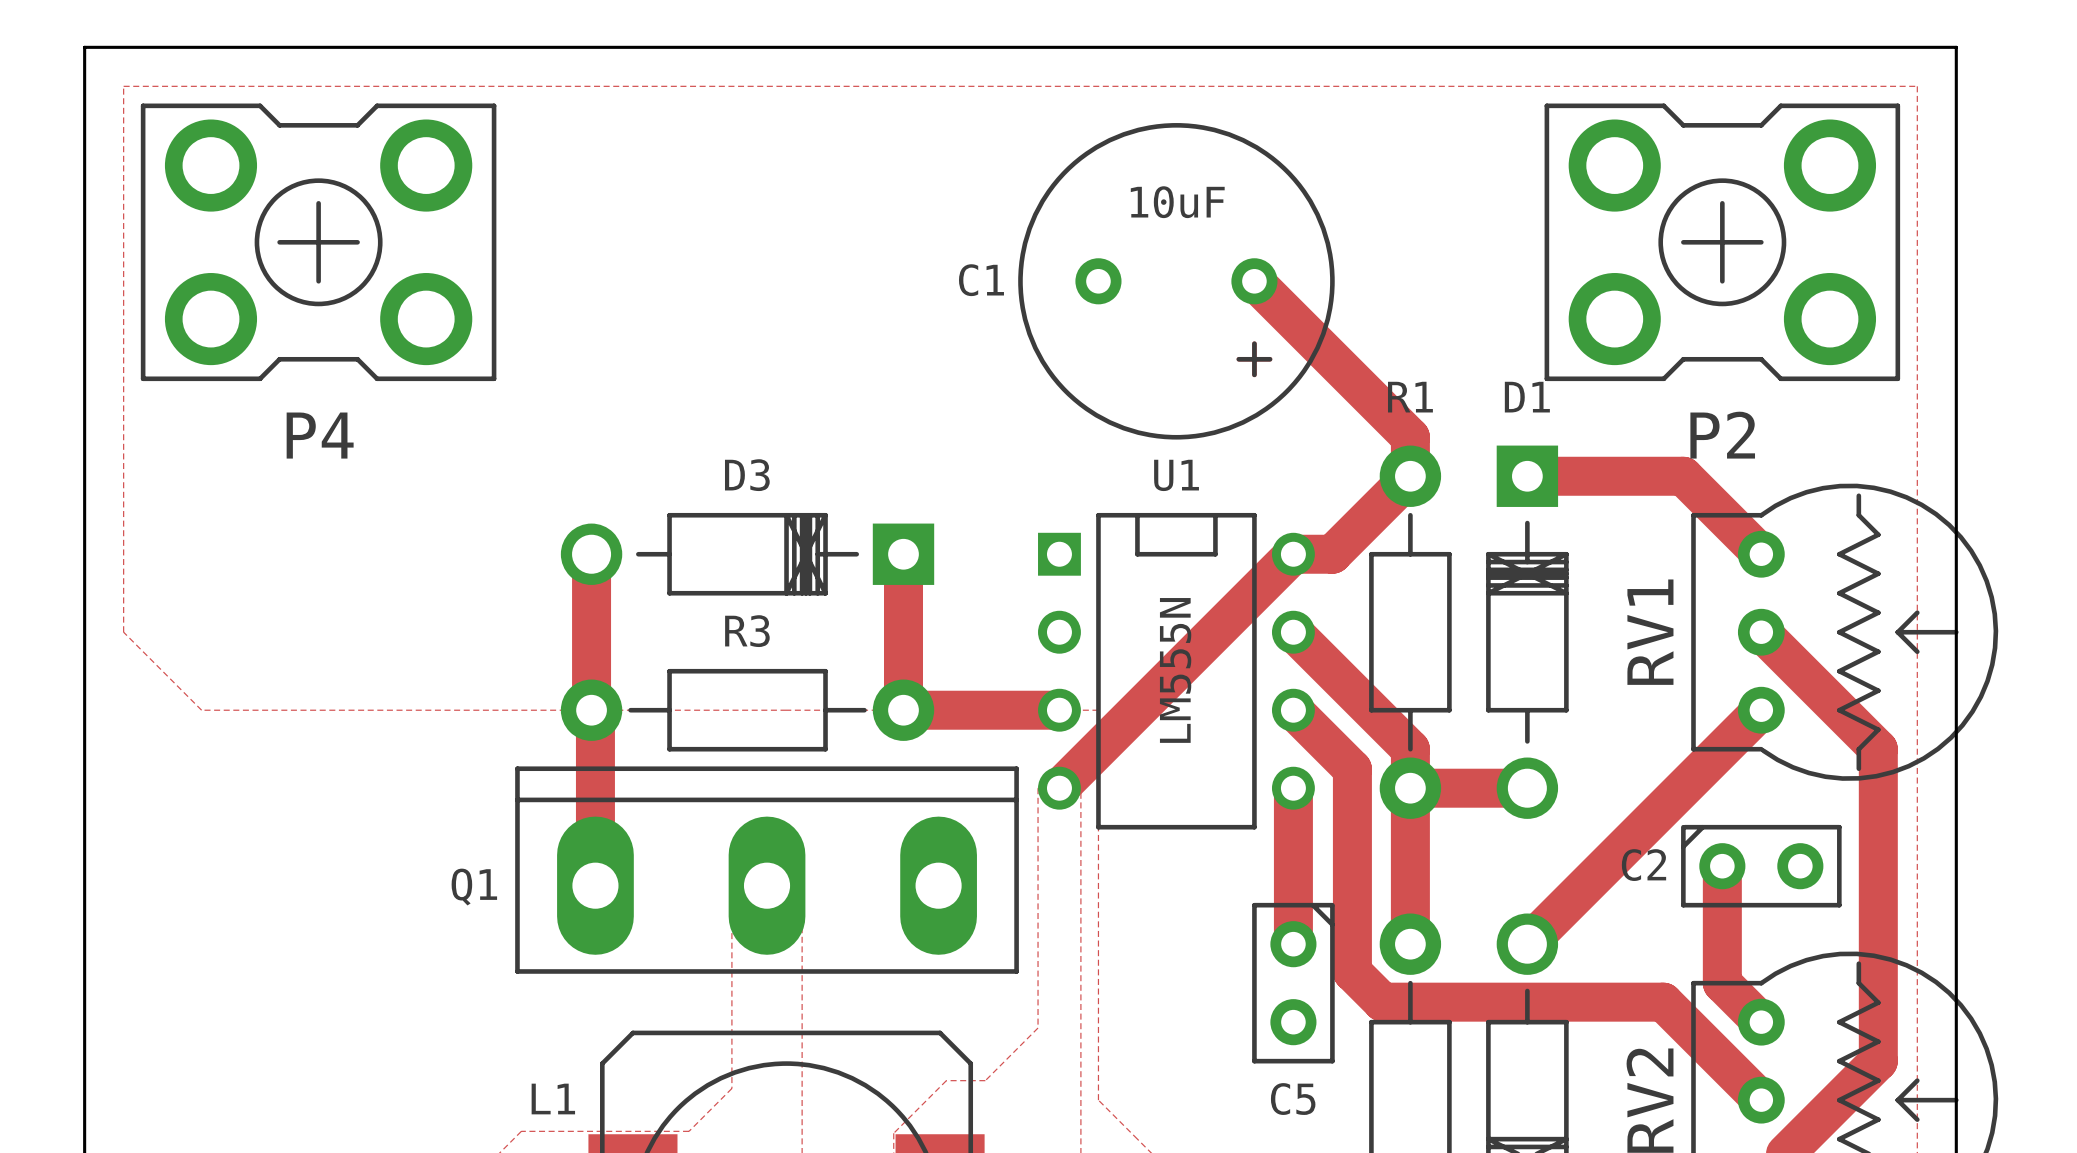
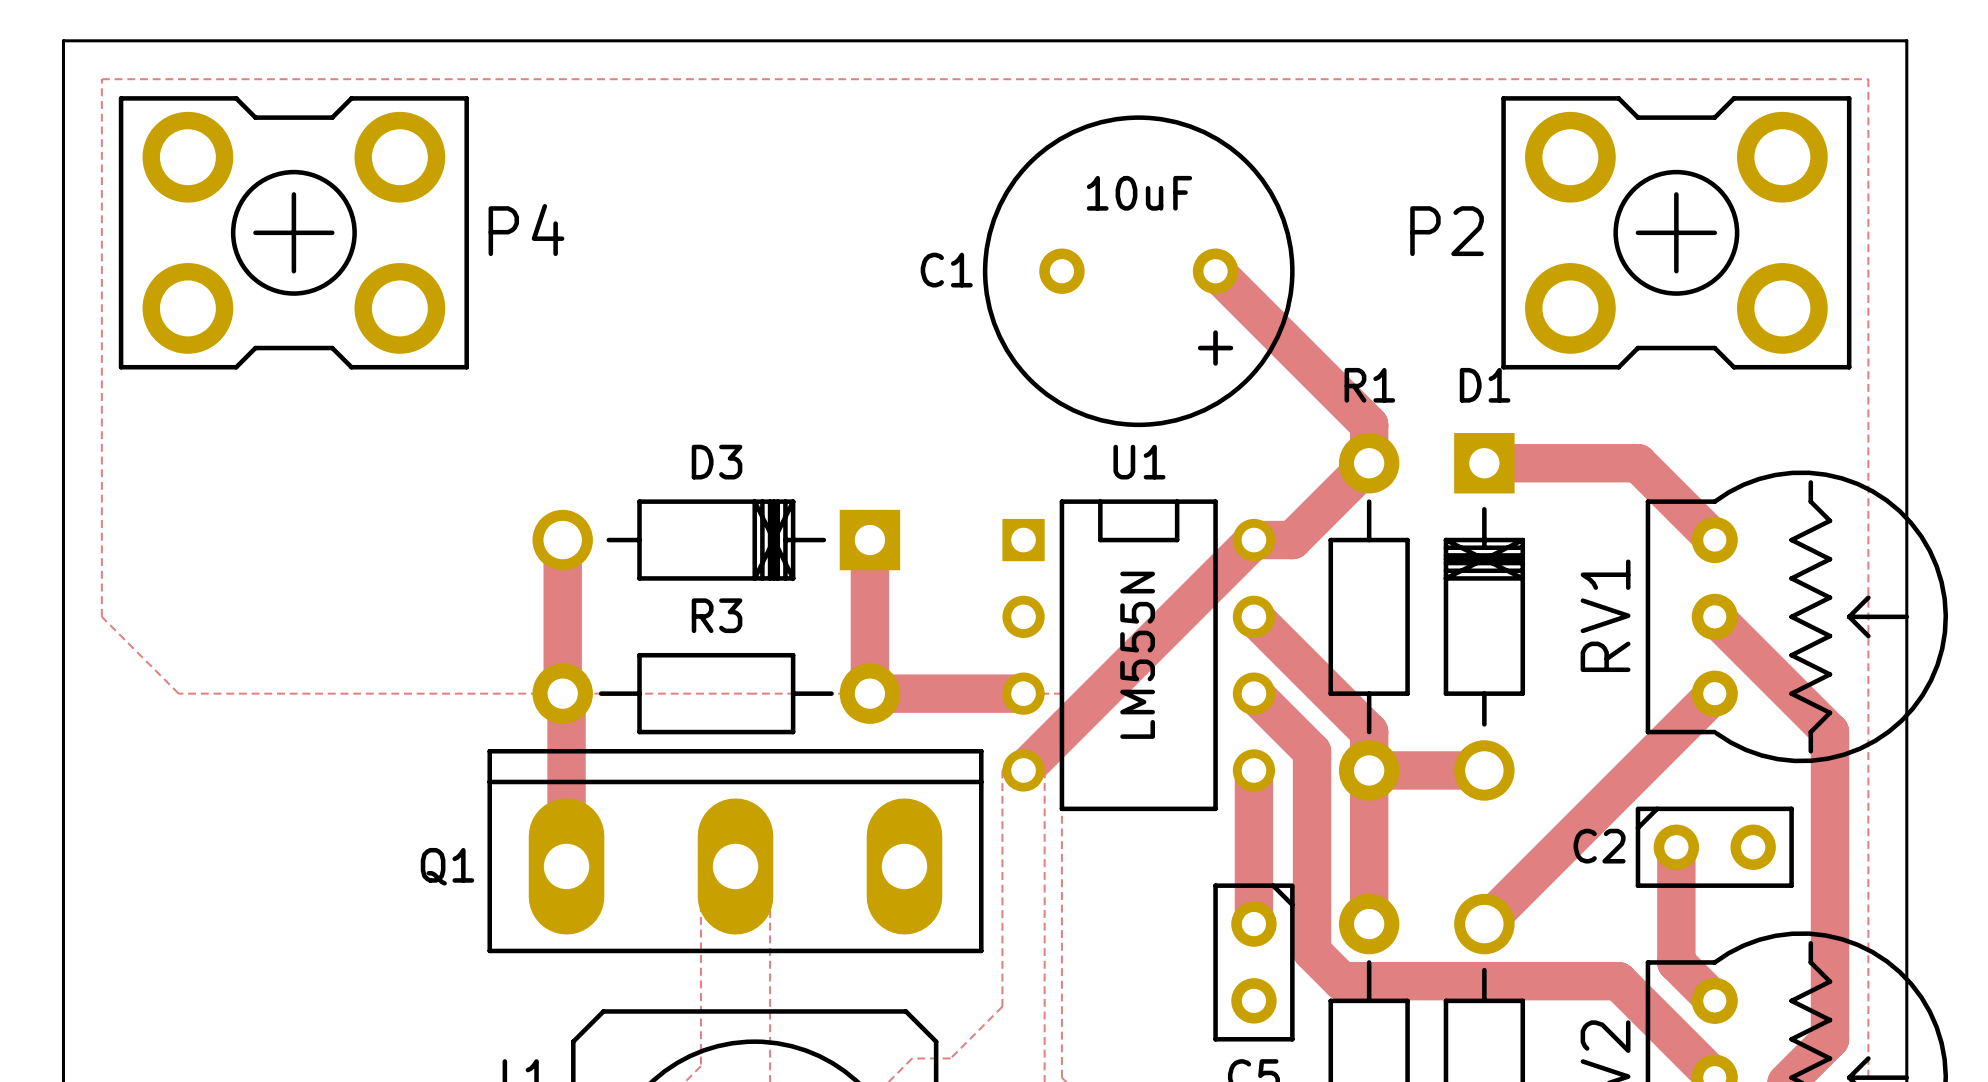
P4 name position: P4 (320, 435) -> P4 (526, 230)
P2 name position: P2 (1722, 435) -> P2 (1447, 231)

